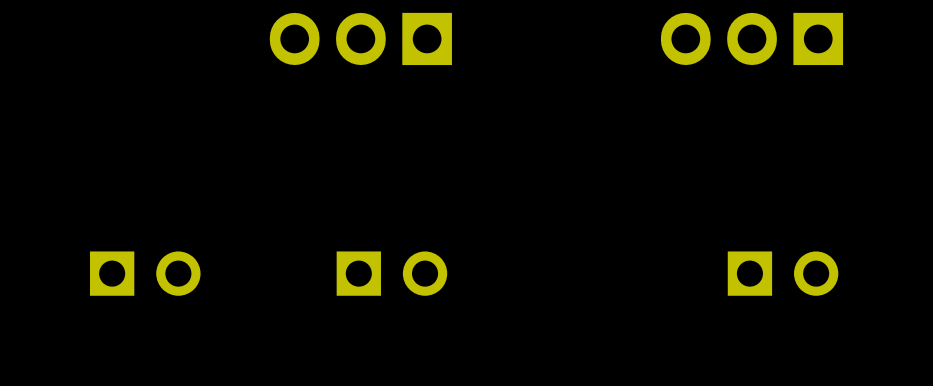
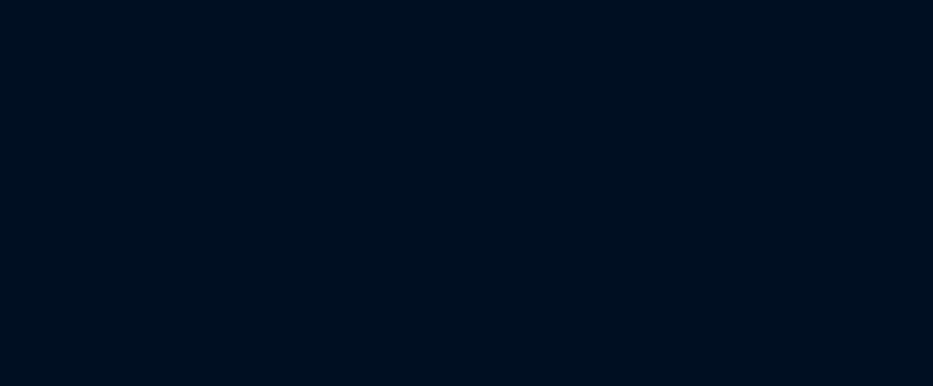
part: (360, 38) -> none
part: (752, 38) -> none
part: (145, 273) -> none
part: (391, 273) -> none
part: (783, 273) -> none

